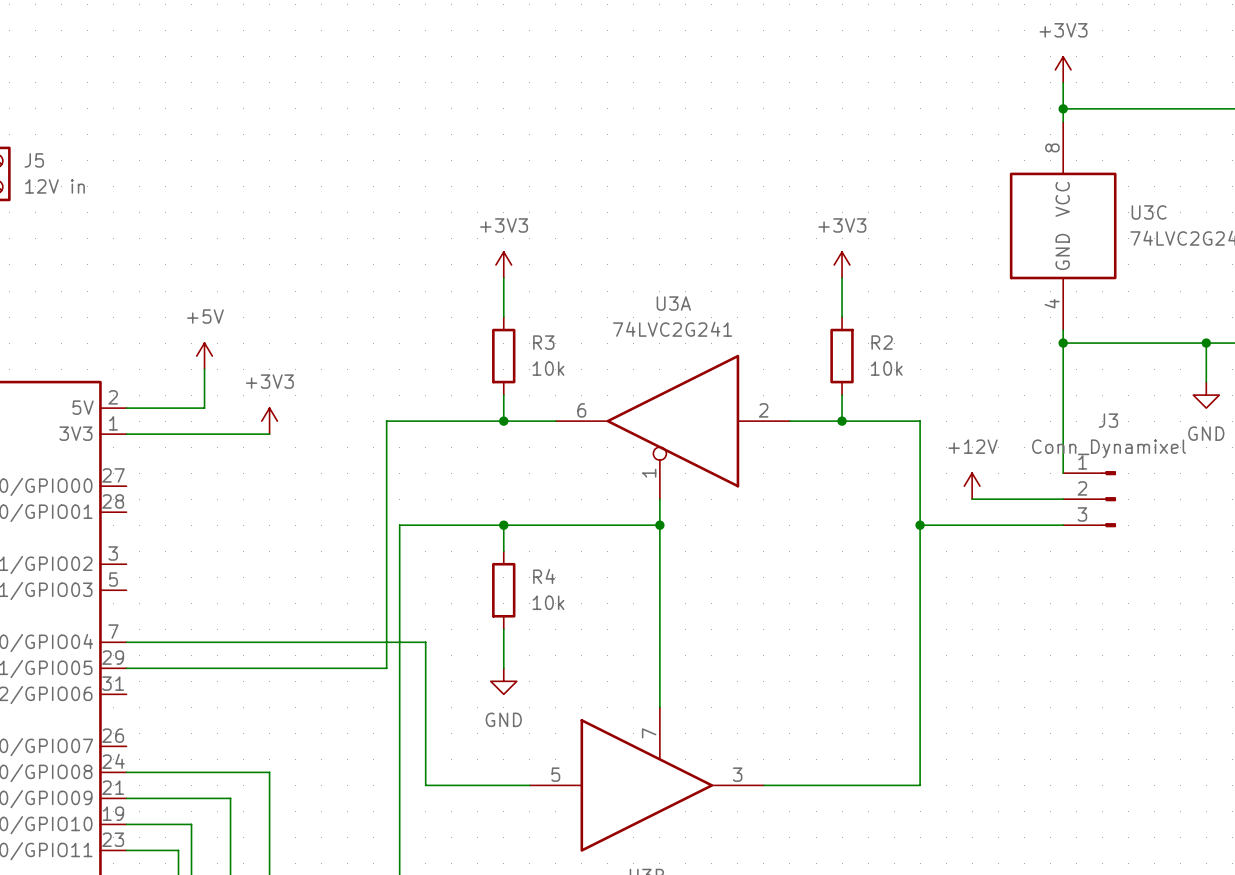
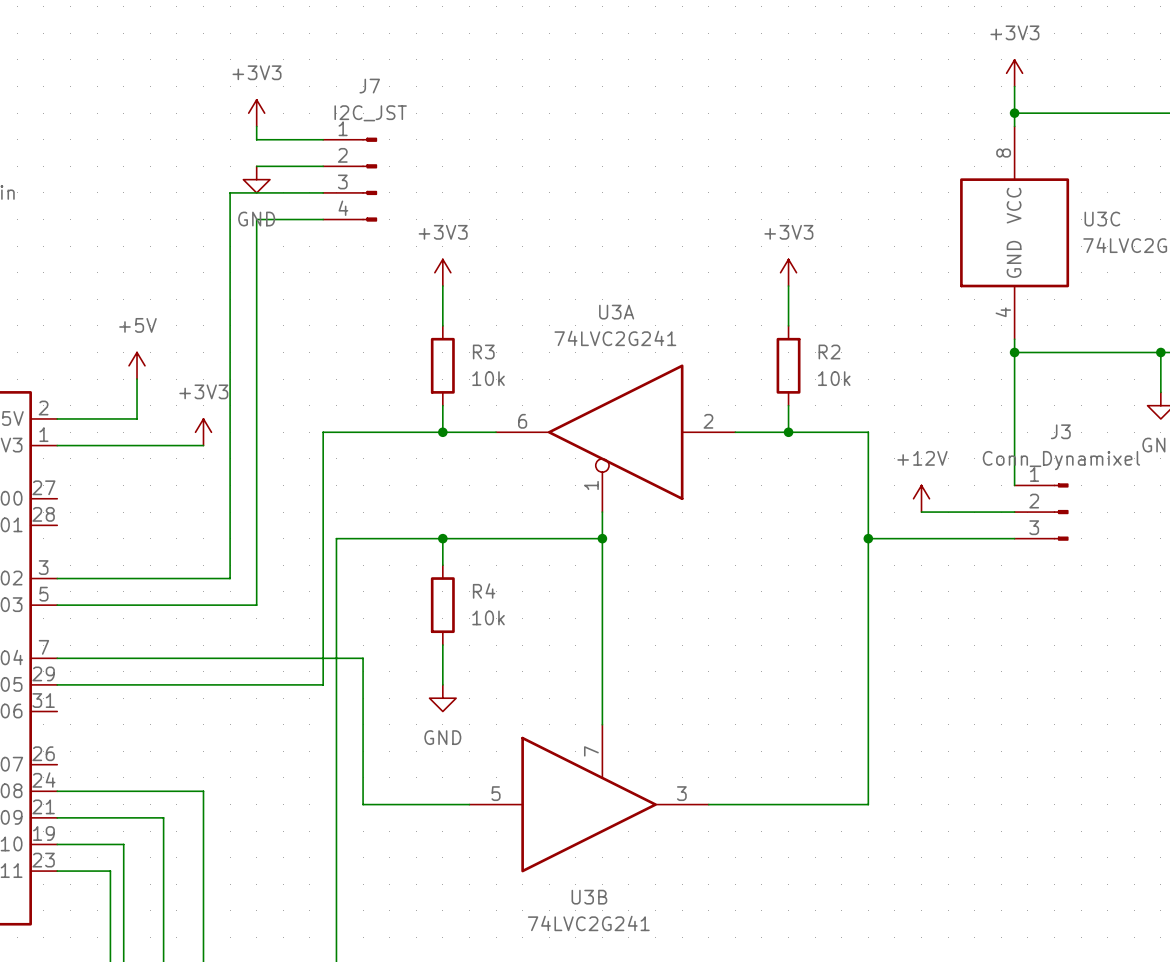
power symbol: none -> +3V3 (256, 113)
wire: none -> (256, 126) (256, 139) (323, 139)
wire: none -> (256, 166) (323, 166)
power symbol: none -> GND (256, 179)
J7: none -> I2C_JST (350, 179)
wire: none -> (323, 192) (230, 192) (230, 578) (57, 578)
wire: none -> (323, 219) (256, 219) (256, 605) (57, 605)

